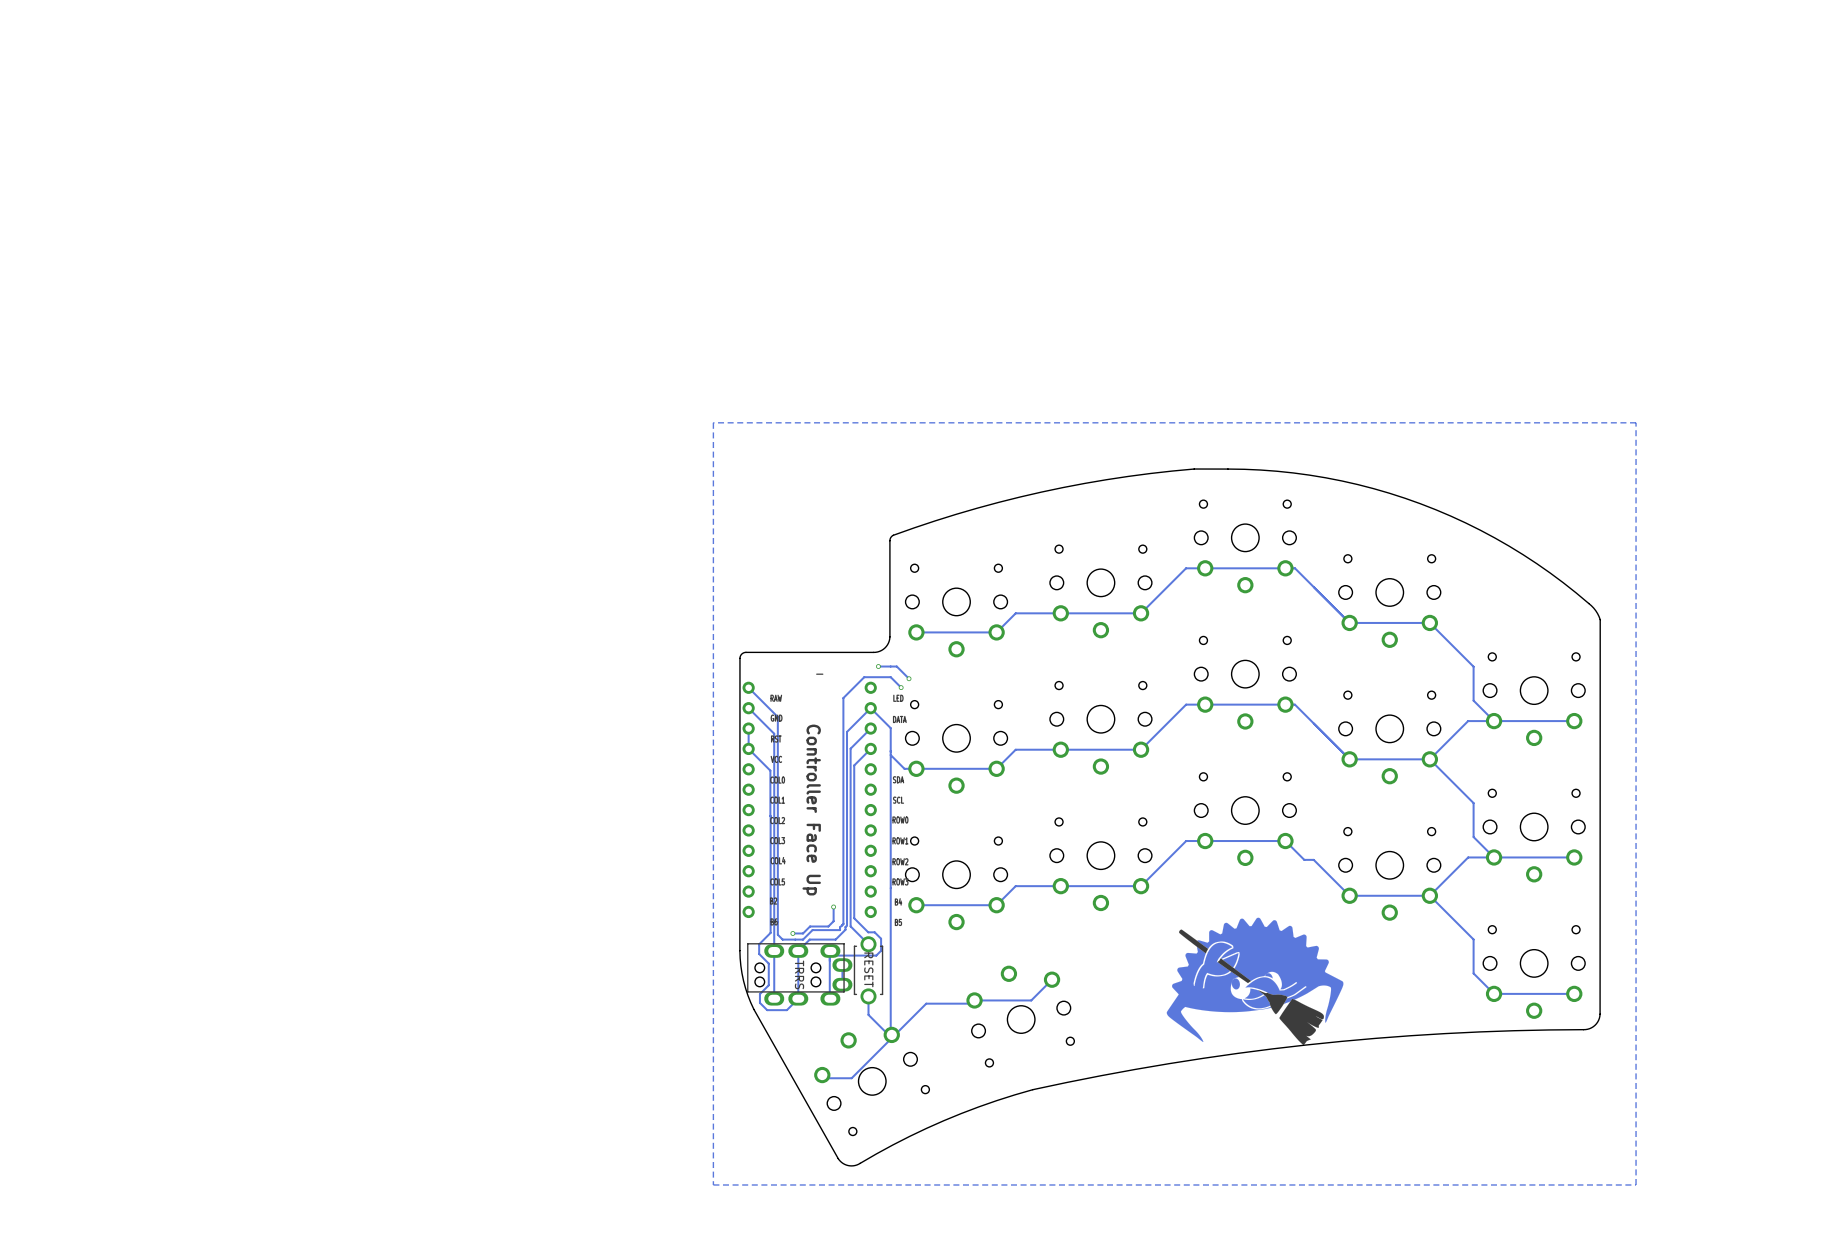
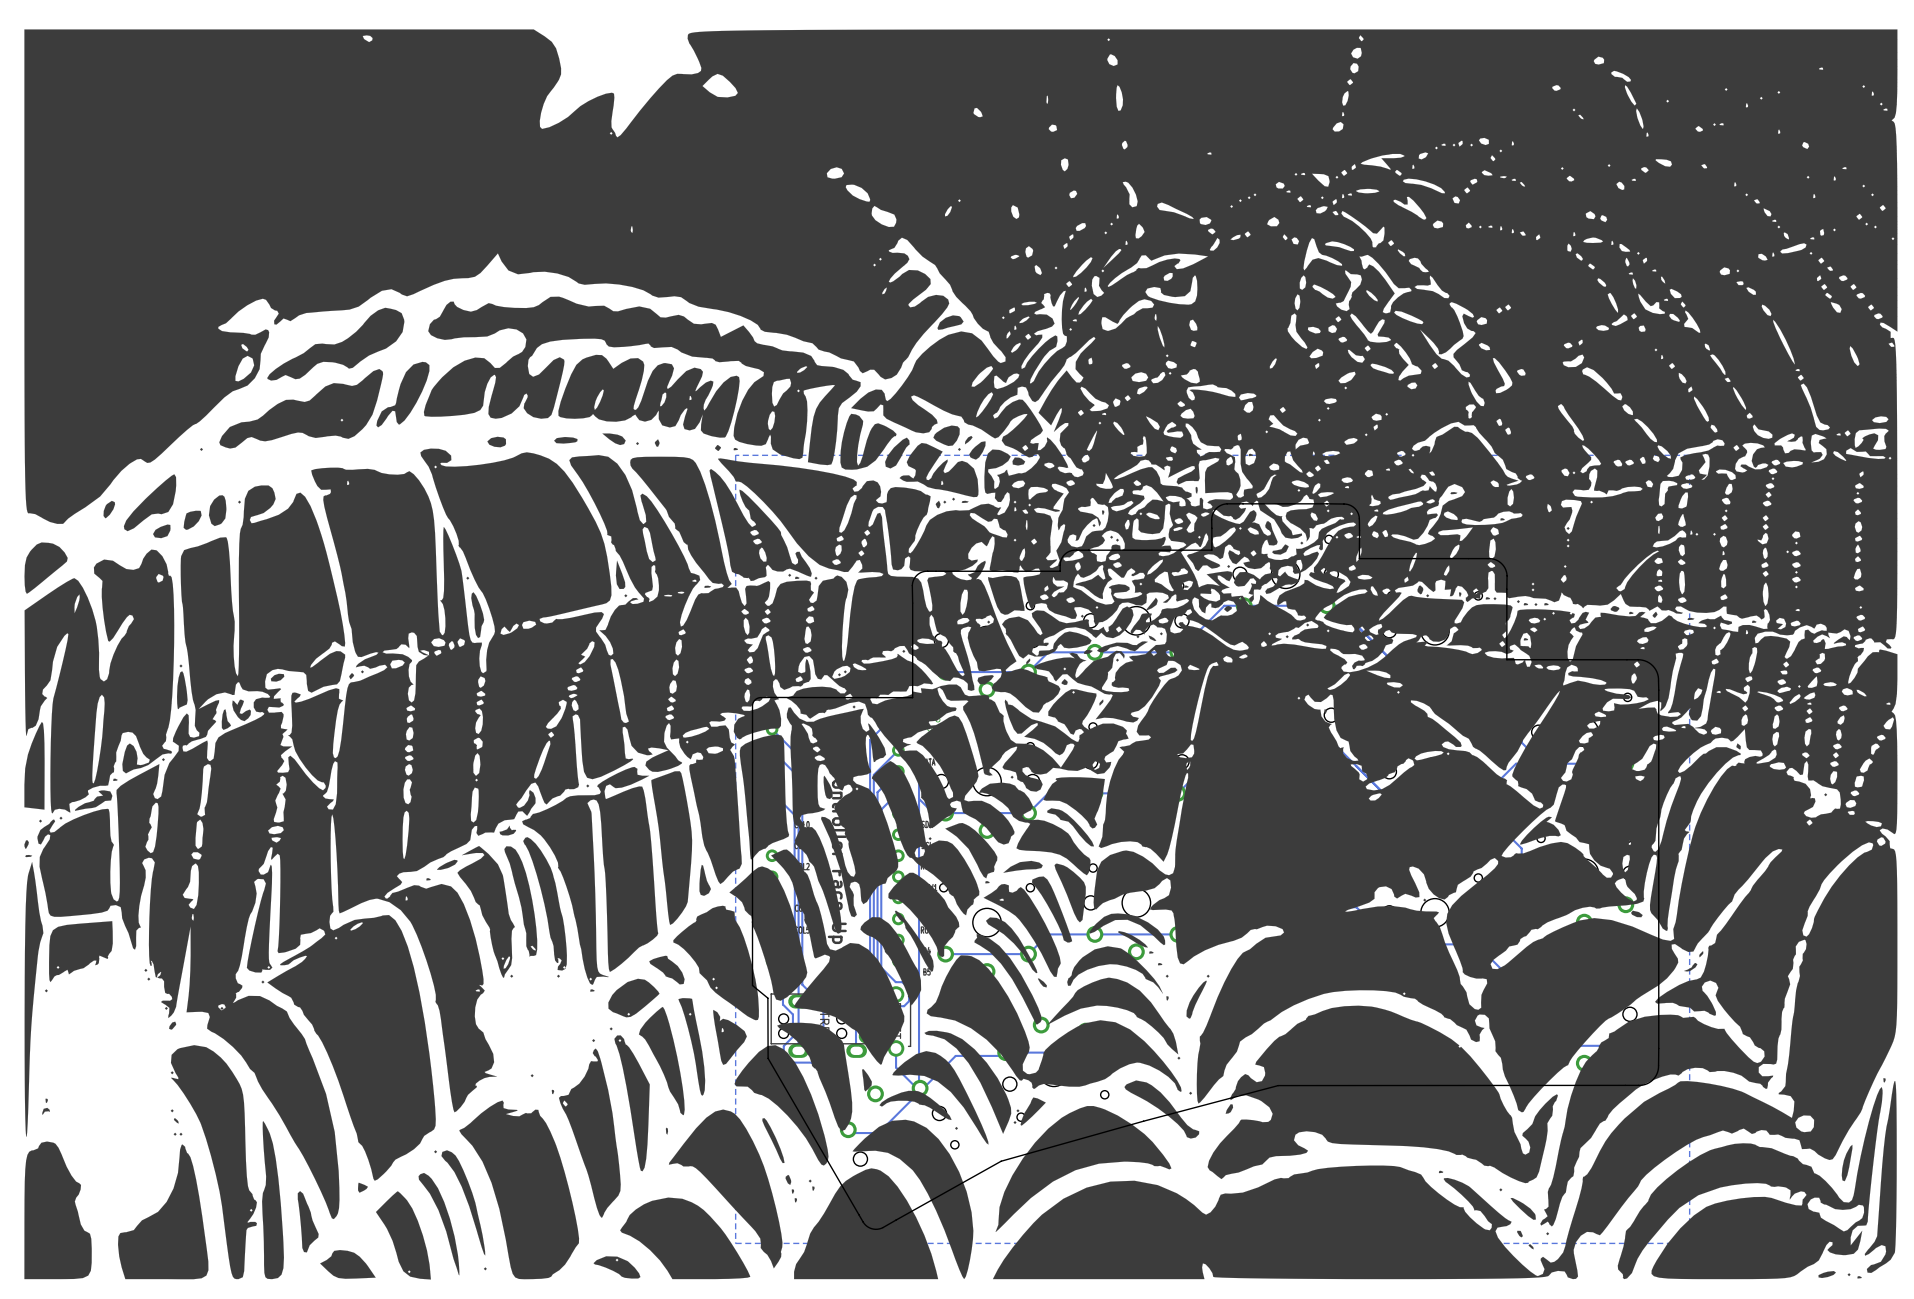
drawing: none -> [24, 29, 1898, 1280]
board edge: (1588, 603) (1595, 610) (1600, 619) (1600, 1014) (1597, 1022) (1593, 1026) (1585, 1029) (1479, 1031) (1341, 1041) (1237, 1053) (1134, 1069) (1014, 1094) (979, 1106) (926, 1128) (856, 1164) (846, 1165) (839, 1160) (753, 1009) (741, 973) (739, 950) (740, 657) (745, 652) (873, 652) (883, 649) (888, 642) (889, 636) (889, 540) (892, 535) (998, 502) (1106, 479) (1194, 469) (1277, 471) (1357, 484) (1435, 509) (1509, 546) (1550, 573) (1588, 603) -> (1327, 503) (1347, 504) (1357, 511) (1359, 518) (1359, 558) (1490, 558) (1501, 563) (1507, 575) (1506, 659) (1640, 659) (1649, 662) (1655, 669) (1658, 690) (1658, 1048) (1658, 1067) (1655, 1076) (1649, 1082) (1640, 1085) (1278, 1085) (1001, 1161) (882, 1227) (875, 1229) (868, 1227) (863, 1222) (768, 1058) (767, 998) (752, 985) (753, 701) (760, 697) (912, 697) (912, 585) (914, 577) (922, 571) (1060, 571) (1062, 556) (1067, 552) (1074, 550) (1211, 550) (1212, 515) (1216, 508) (1221, 505) (1327, 503)
drawing: [1166, 917, 1344, 1045] -> none

